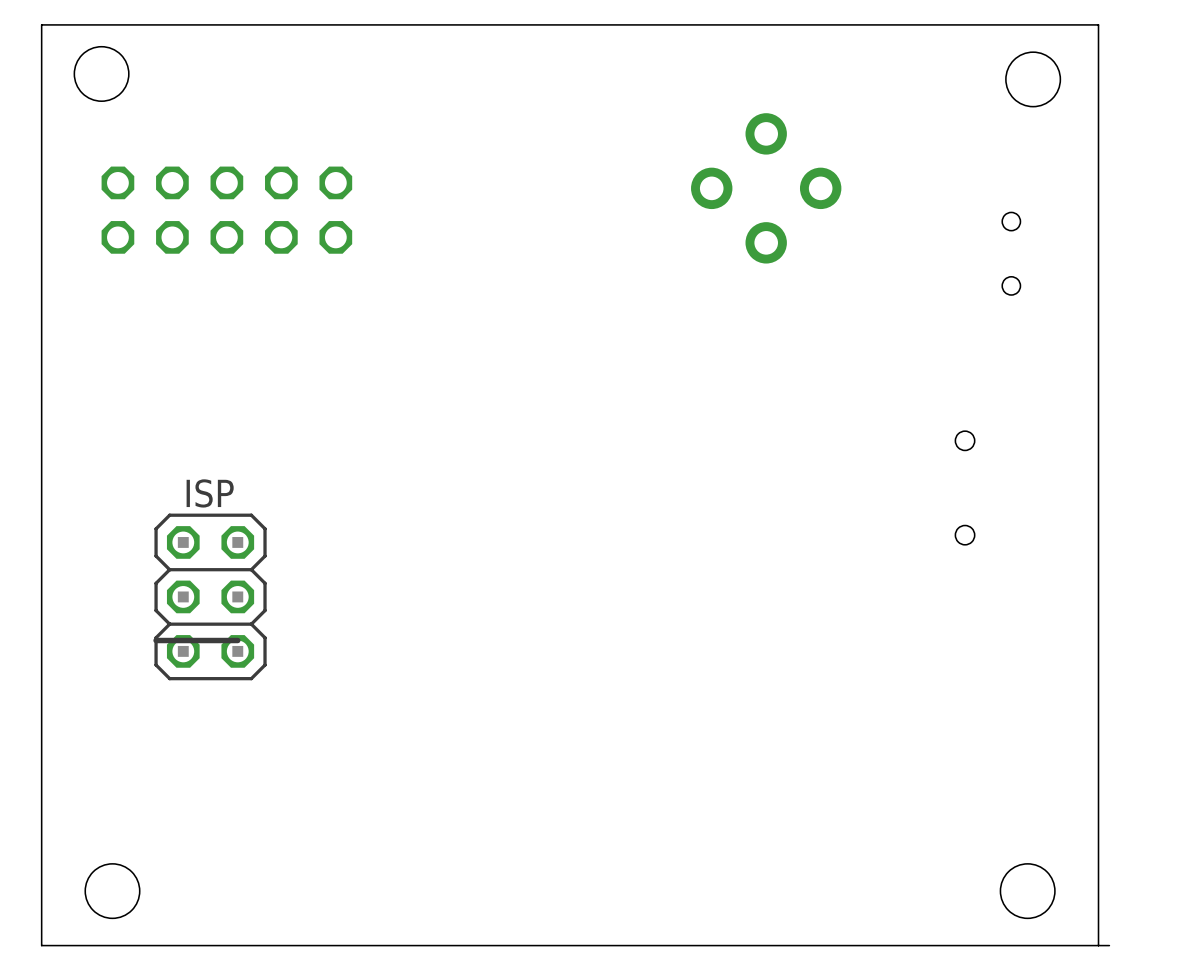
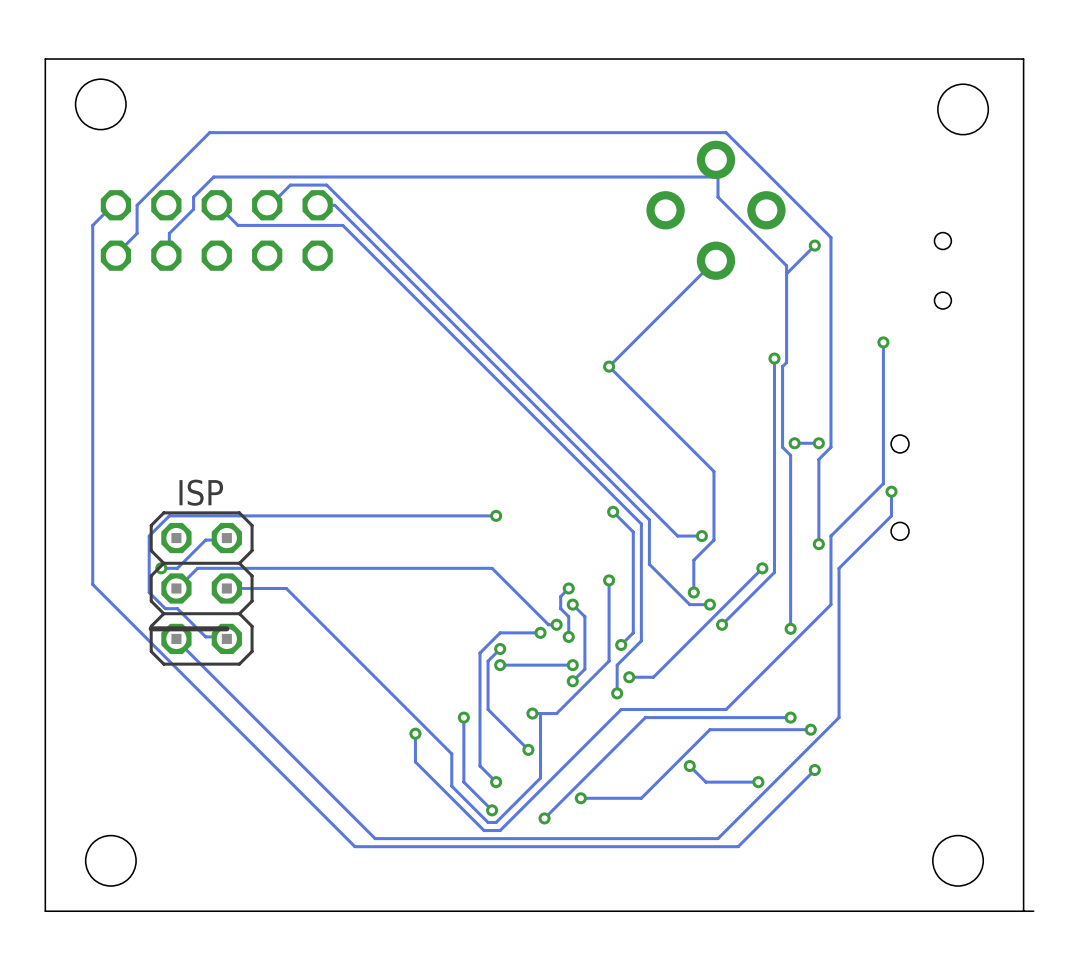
track: none -> (115, 205) (112, 205) (92, 225) (92, 584) (354, 846) (738, 846) (814, 770)
track: none -> (216, 205) (237, 225) (342, 225) (641, 523) (641, 640) (617, 665) (617, 693)
track: none -> (267, 205) (270, 205) (290, 185) (326, 185) (677, 536) (701, 536)
track: none -> (317, 205) (334, 205) (649, 519) (649, 564) (689, 604) (709, 604)
track: none -> (814, 245) (786, 273)
via: none -> (814, 245)
track: none -> (115, 255) (137, 233) (137, 205) (209, 132) (726, 132) (830, 237) (830, 447) (818, 459) (818, 544)
track: none -> (166, 255) (169, 253) (169, 233) (193, 209) (193, 197) (213, 177) (718, 177) (715, 159) (718, 160) (718, 197) (786, 265) (786, 362) (782, 366) (782, 447) (790, 455) (790, 628)
track: none -> (715, 260) (609, 366) (713, 471) (713, 540) (693, 560) (693, 592)
track: none -> (883, 342) (883, 483) (830, 536) (830, 604) (726, 709) (621, 709) (500, 830) (484, 830) (415, 761) (415, 733)
via: none -> (883, 342)
track: none -> (774, 358) (774, 572) (722, 624)
via: none -> (774, 358)
via: none -> (609, 366)
via: none -> (794, 443)
track: none -> (818, 443) (794, 443)
via: none -> (818, 443)
track: none -> (891, 491) (891, 515) (839, 568) (839, 717) (718, 838) (375, 838) (176, 638)
via: none -> (891, 491)
track: none -> (613, 511) (633, 532) (633, 632) (621, 644)
via: none -> (613, 511)
track: none -> (496, 515) (169, 515) (149, 536) (149, 592) (165, 608) (177, 608) (205, 636) (225, 636) (226, 638)
via: none -> (496, 515)
via: none -> (701, 536)
track: none -> (226, 538) (225, 540) (205, 540) (177, 568) (161, 568)
via: none -> (818, 544)
via: none -> (161, 568)
track: none -> (762, 568) (653, 677) (629, 677)
via: none -> (762, 568)
track: none -> (609, 580) (609, 661) (556, 713) (532, 713)
via: none -> (609, 580)
track: none -> (176, 588) (197, 568) (492, 568) (548, 624) (556, 624)
track: none -> (226, 588) (286, 588) (451, 753) (451, 786) (488, 822) (496, 822) (540, 778) (540, 713)
track: none -> (568, 588) (560, 596) (560, 608) (568, 616) (568, 636)
via: none -> (568, 588)
via: none -> (693, 592)
track: none -> (572, 604) (584, 616) (584, 669) (572, 681)
via: none -> (572, 604)
via: none -> (709, 604)
via: none -> (556, 624)
via: none -> (722, 624)
via: none -> (790, 628)
track: none -> (540, 632) (500, 632) (479, 653) (479, 765) (496, 782)
via: none -> (540, 632)
via: none -> (568, 636)
via: none -> (621, 644)
track: none -> (500, 649) (488, 661) (488, 709) (528, 749)
via: none -> (500, 649)
via: none -> (500, 665)
track: none -> (572, 665) (500, 665)
via: none -> (572, 665)
via: none -> (629, 677)
via: none -> (572, 681)
via: none -> (617, 693)
via: none -> (532, 713)
track: none -> (463, 717) (463, 782) (492, 810)
via: none -> (463, 717)
track: none -> (790, 717) (645, 717) (544, 818)
via: none -> (790, 717)
track: none -> (810, 729) (709, 729) (641, 798) (580, 798)
via: none -> (810, 729)
via: none -> (415, 733)
via: none -> (528, 749)
track: none -> (689, 765) (705, 782) (758, 782)
via: none -> (689, 765)
via: none -> (814, 770)
via: none -> (496, 782)
via: none -> (758, 782)
via: none -> (580, 798)
via: none -> (492, 810)
via: none -> (544, 818)

